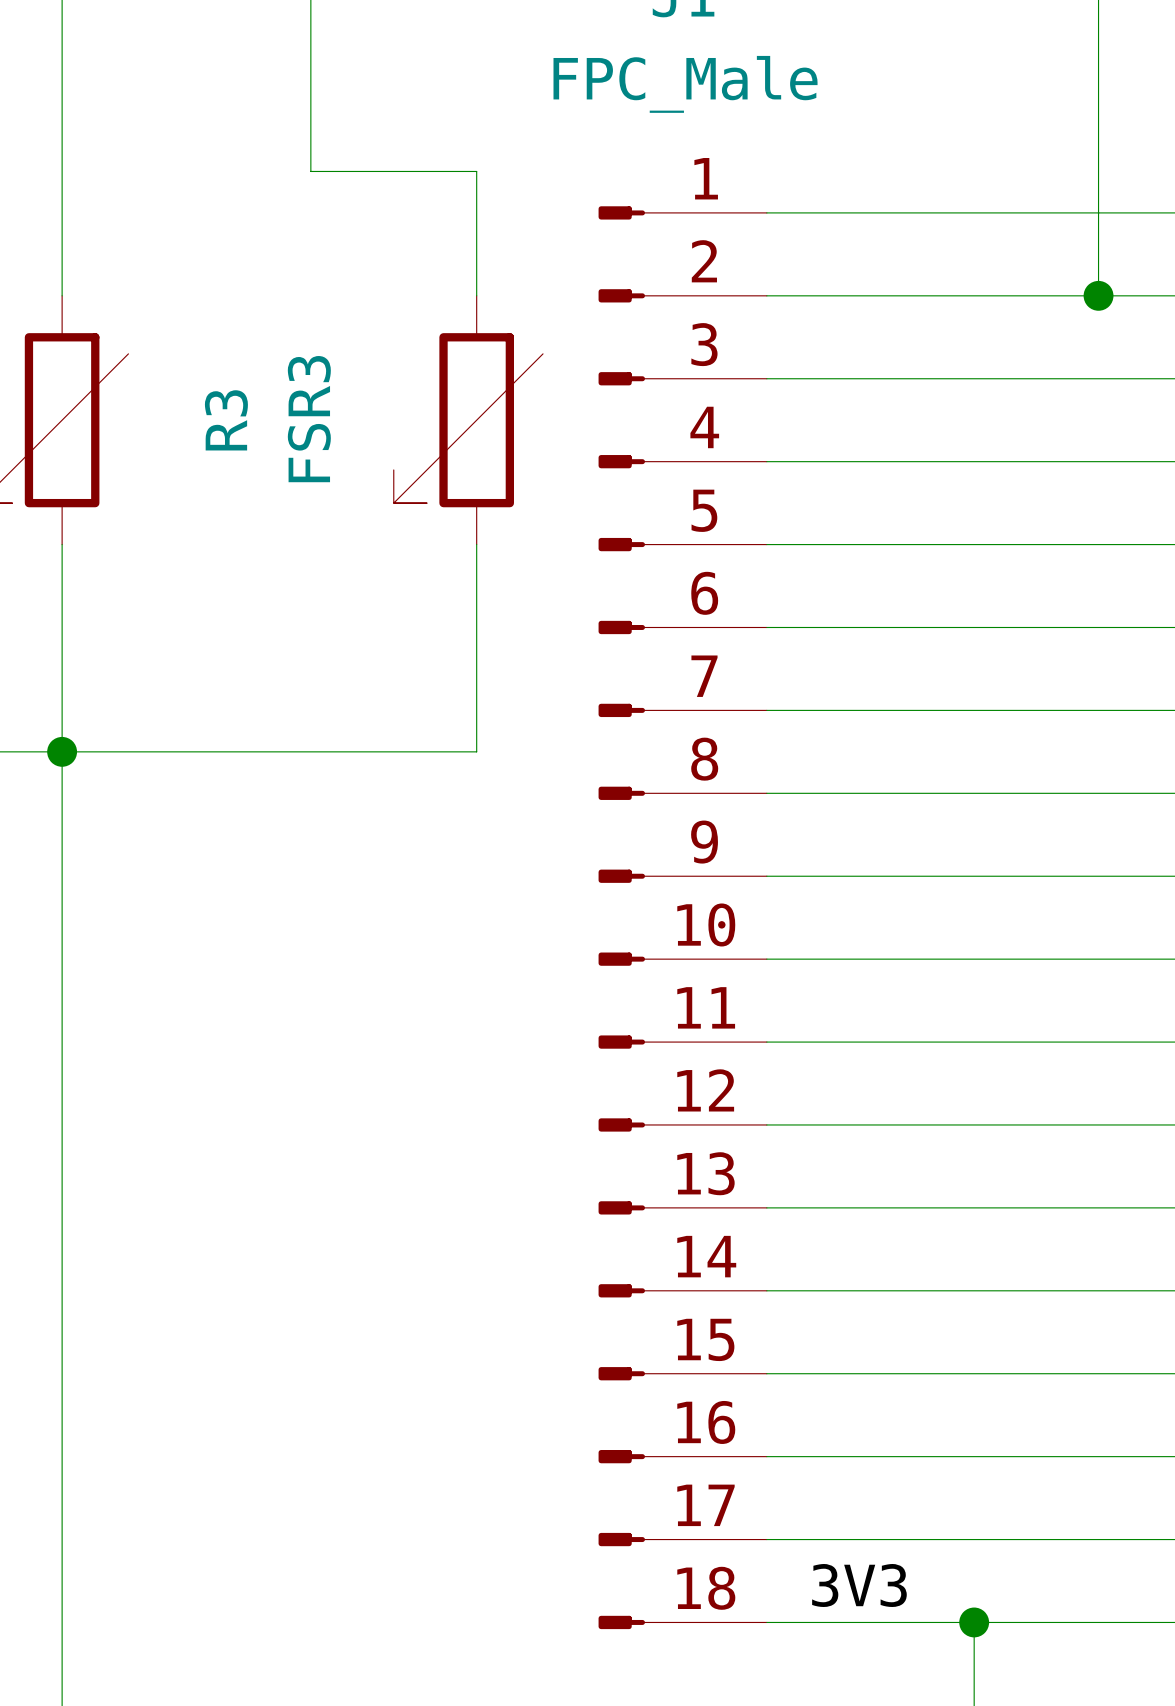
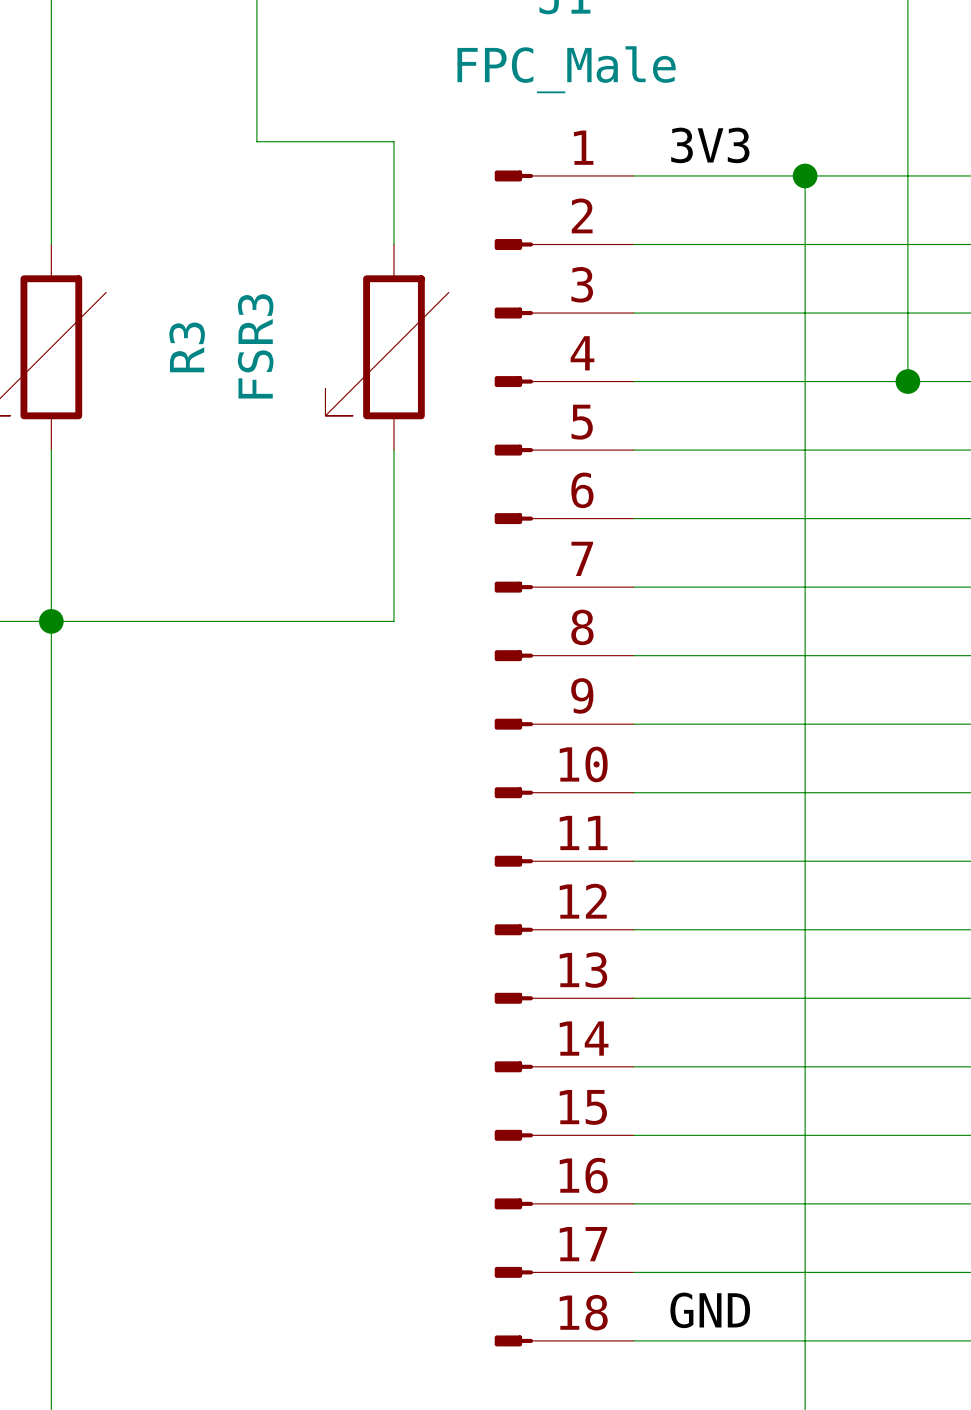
label: none -> 3V3 (710, 145)
wire: none -> (805, 175) (805, 1340)
junction: none -> (805, 175)
wire: none -> (907, 244) (907, 381)
junction: (1098, 295) -> none
junction: none -> (907, 381)
label: 3V3 (859, 1585) -> GND (710, 1310)
junction: (974, 1622) -> none

